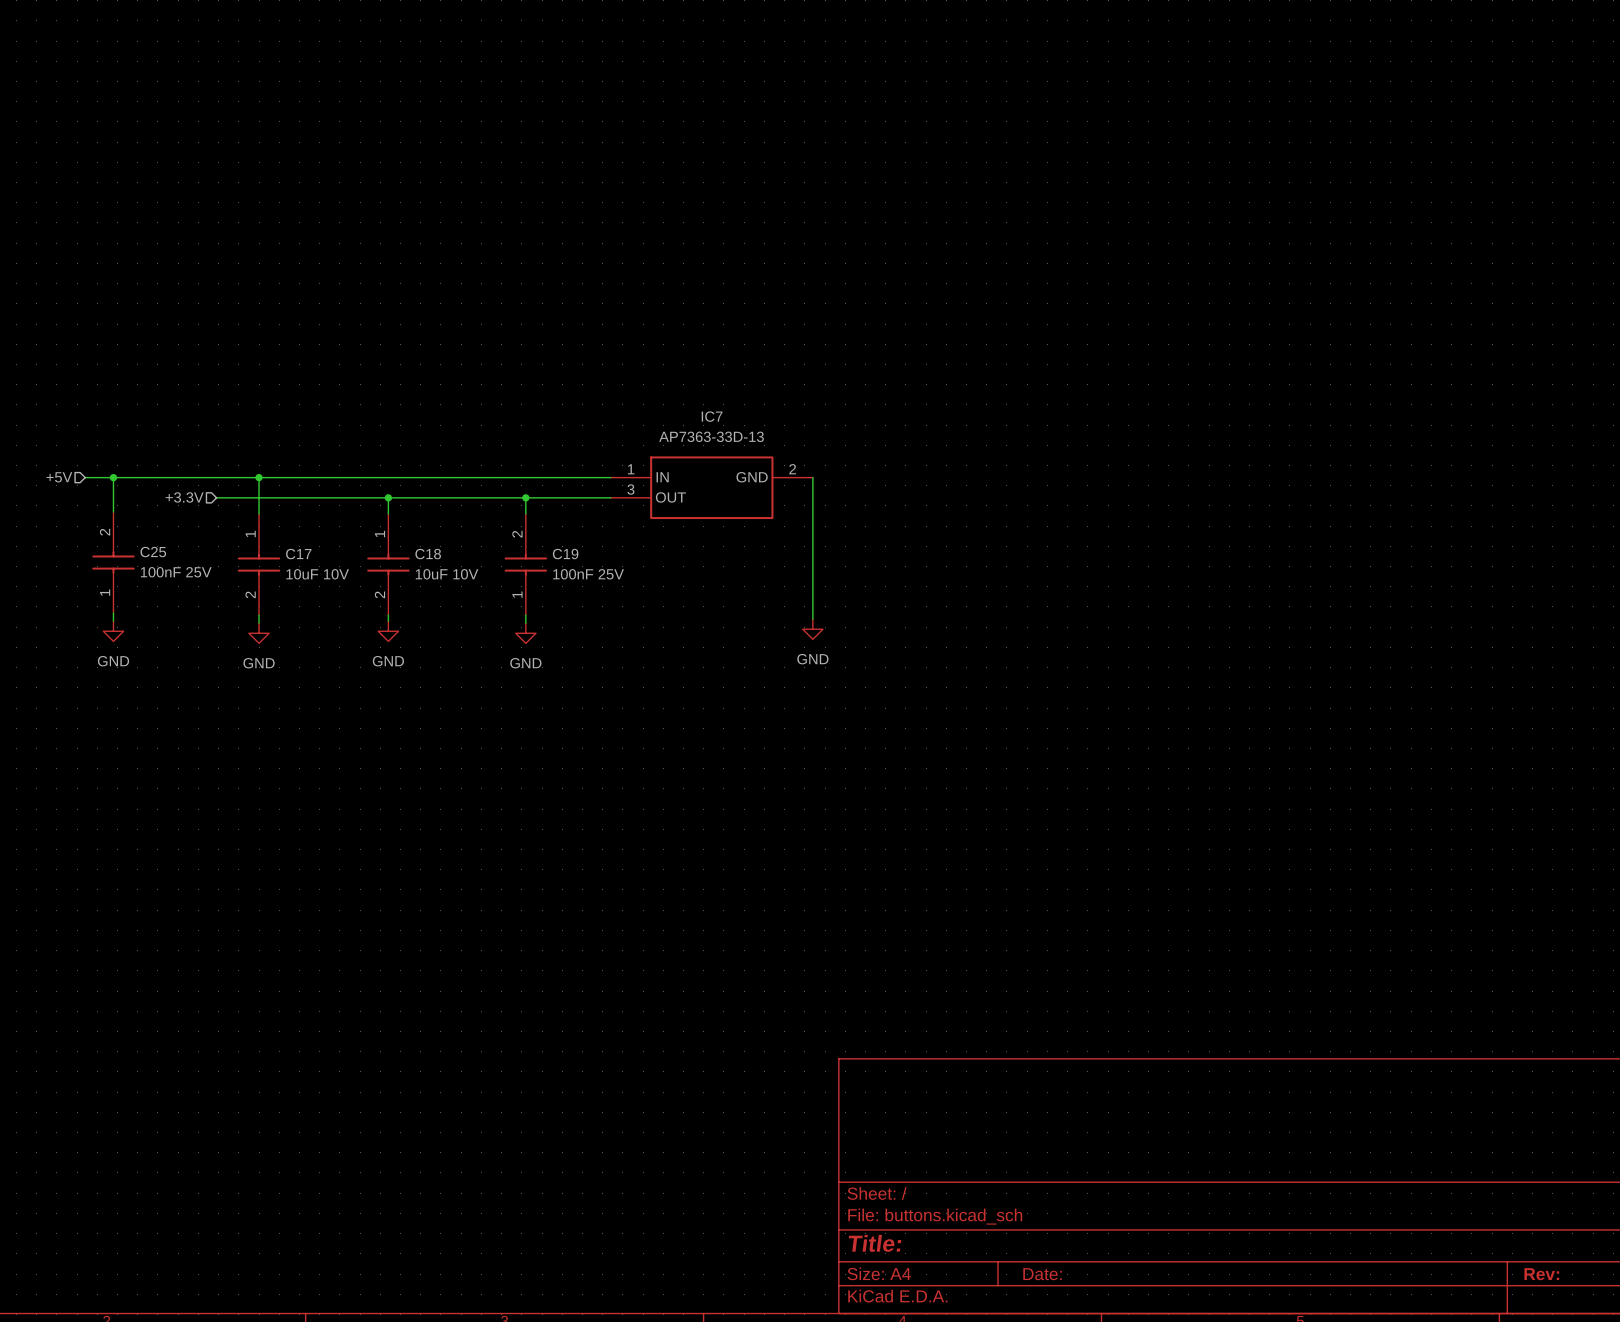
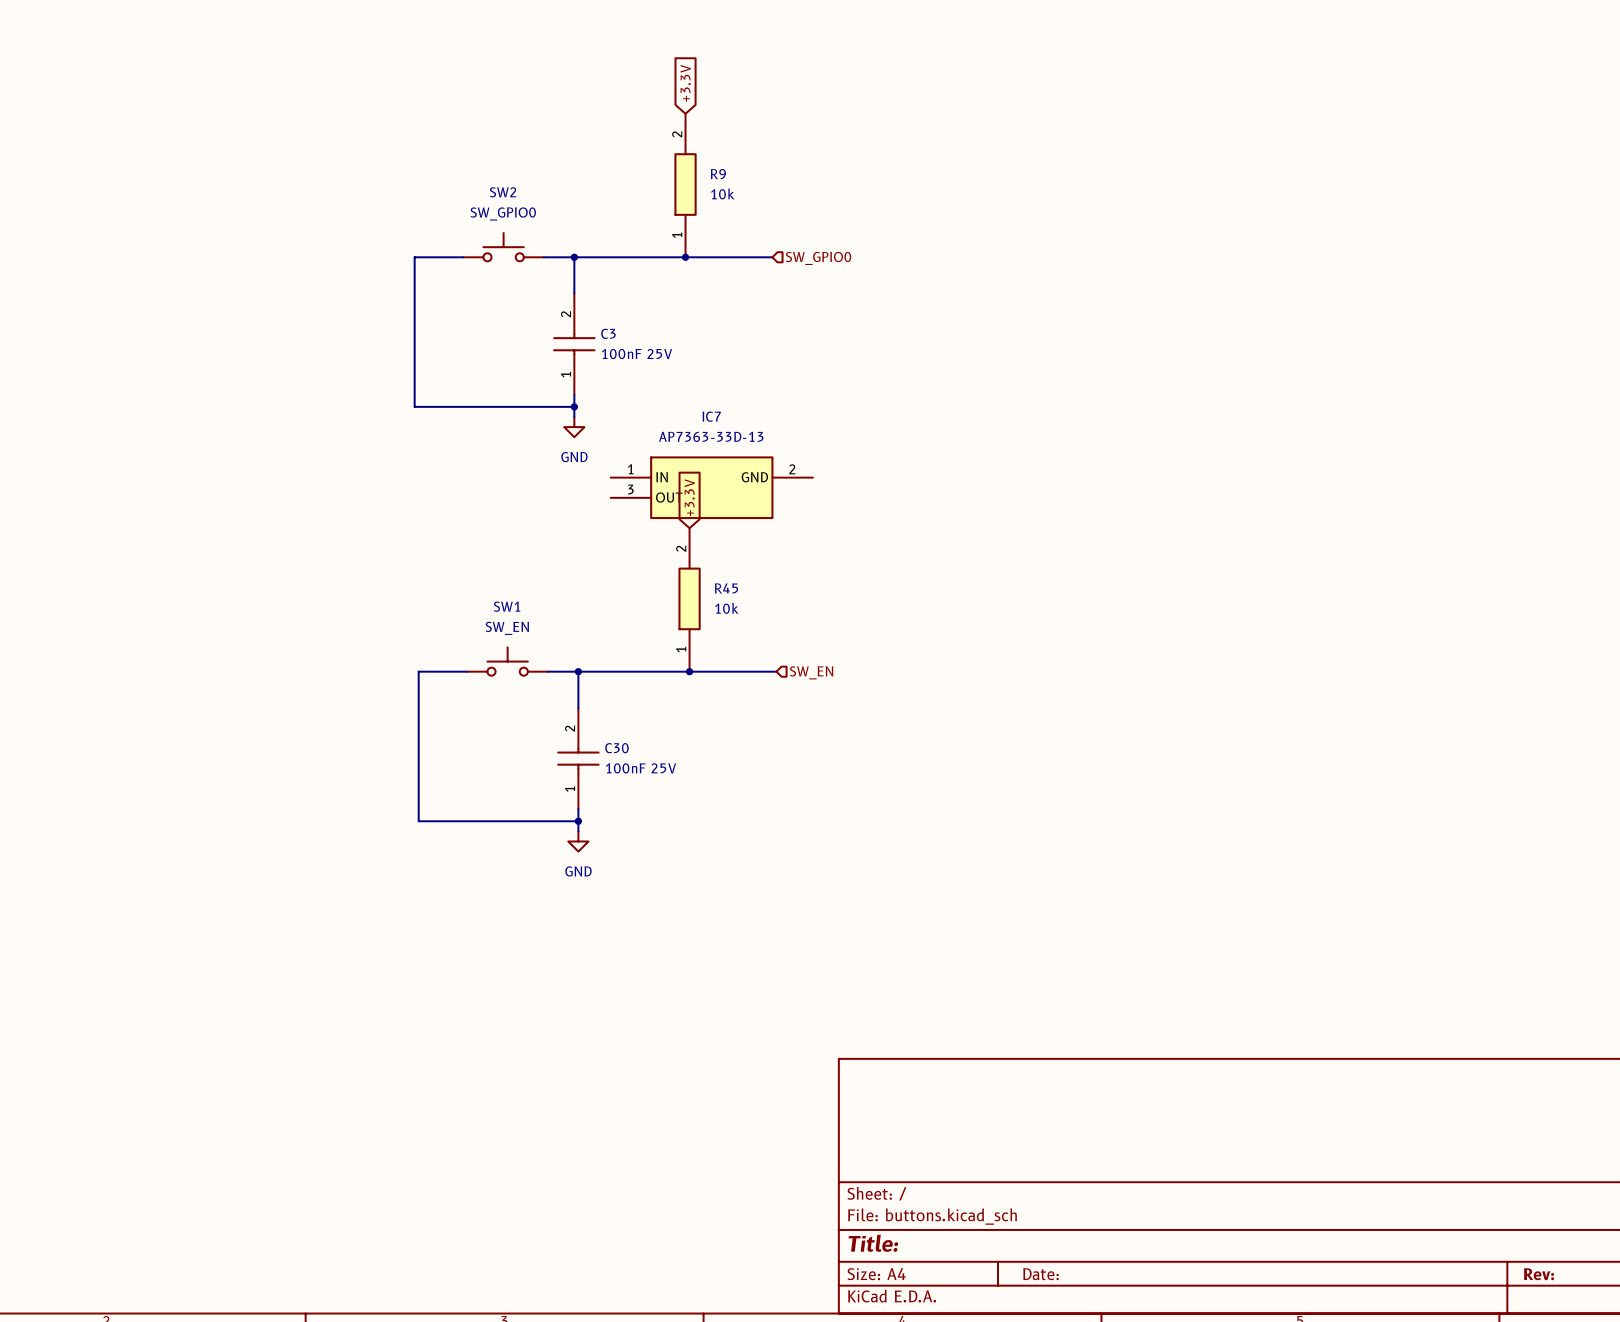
global label: none -> +3.3V (685, 83)
R9: none -> 10k (685, 184)
SW2: none -> SW_GPIO0 (503, 247)
wire: none -> (463, 257) (414, 257) (414, 406) (574, 406)
wire: none -> (544, 257) (772, 257)
wire: none -> (574, 257) (574, 293)
junction: none -> (574, 257)
junction: none -> (685, 257)
hierarchical label: none -> SW_GPIO0 (818, 258)
C3: none -> 100nF 25V (574, 344)
wire: none -> (574, 394) (574, 416)
junction: none -> (574, 406)
power symbol: none -> GND (574, 427)
hierarchical label: +5V (59, 477) -> none
wire: (85, 477) (610, 477) -> none
wire: (113, 477) (113, 511) -> none
junction: (113, 477) -> none
wire: (259, 477) (259, 514) -> none
junction: (259, 477) -> none
wire: (812, 477) (812, 619) -> none
hierarchical label: +3.3V (184, 497) -> none
wire: (216, 497) (610, 497) -> none
wire: (388, 497) (388, 514) -> none
junction: (388, 497) -> none
wire: (525, 497) (525, 514) -> none
junction: (525, 497) -> none
global label: none -> +3.3V (689, 497)
C25: 100nF 25V (113, 562) -> none
C17: 10uF 10V (259, 564) -> none
C18: 10uF 10V (388, 564) -> none
C19: 100nF 25V (525, 564) -> none
R45: none -> 10k (689, 598)
wire: (113, 613) (113, 621) -> none
wire: (259, 615) (259, 623) -> none
wire: (388, 615) (388, 621) -> none
wire: (525, 615) (525, 623) -> none
power symbol: GND (812, 629) -> none
power symbol: GND (113, 631) -> none
power symbol: GND (388, 631) -> none
power symbol: GND (259, 633) -> none
power symbol: GND (525, 633) -> none
SW1: none -> SW_EN (507, 661)
wire: none -> (467, 671) (418, 671) (418, 821) (578, 821)
wire: none -> (548, 671) (776, 671)
wire: none -> (578, 671) (578, 708)
junction: none -> (578, 671)
junction: none -> (689, 671)
hierarchical label: none -> SW_EN (811, 672)
C30: none -> 100nF 25V (578, 758)
wire: none -> (578, 809) (578, 831)
junction: none -> (578, 821)
power symbol: none -> GND (578, 841)

